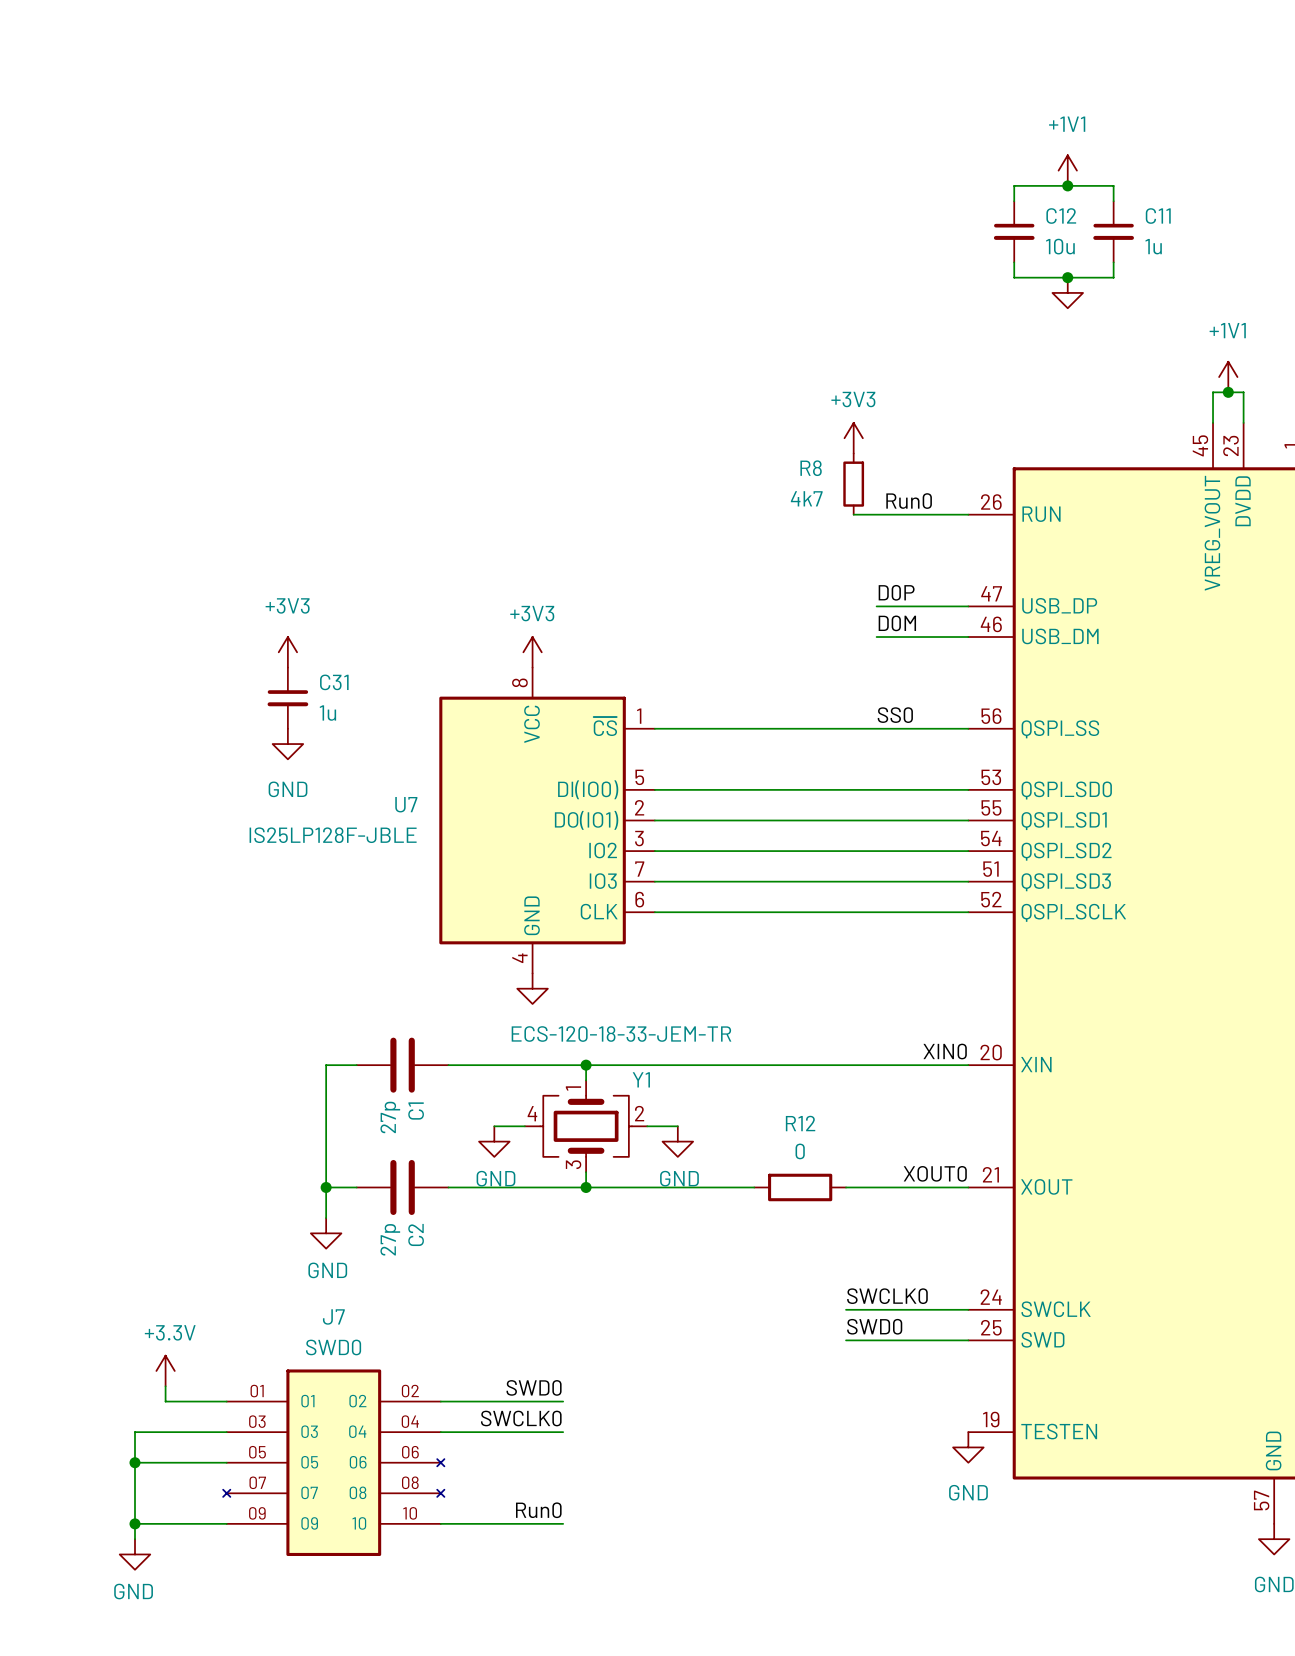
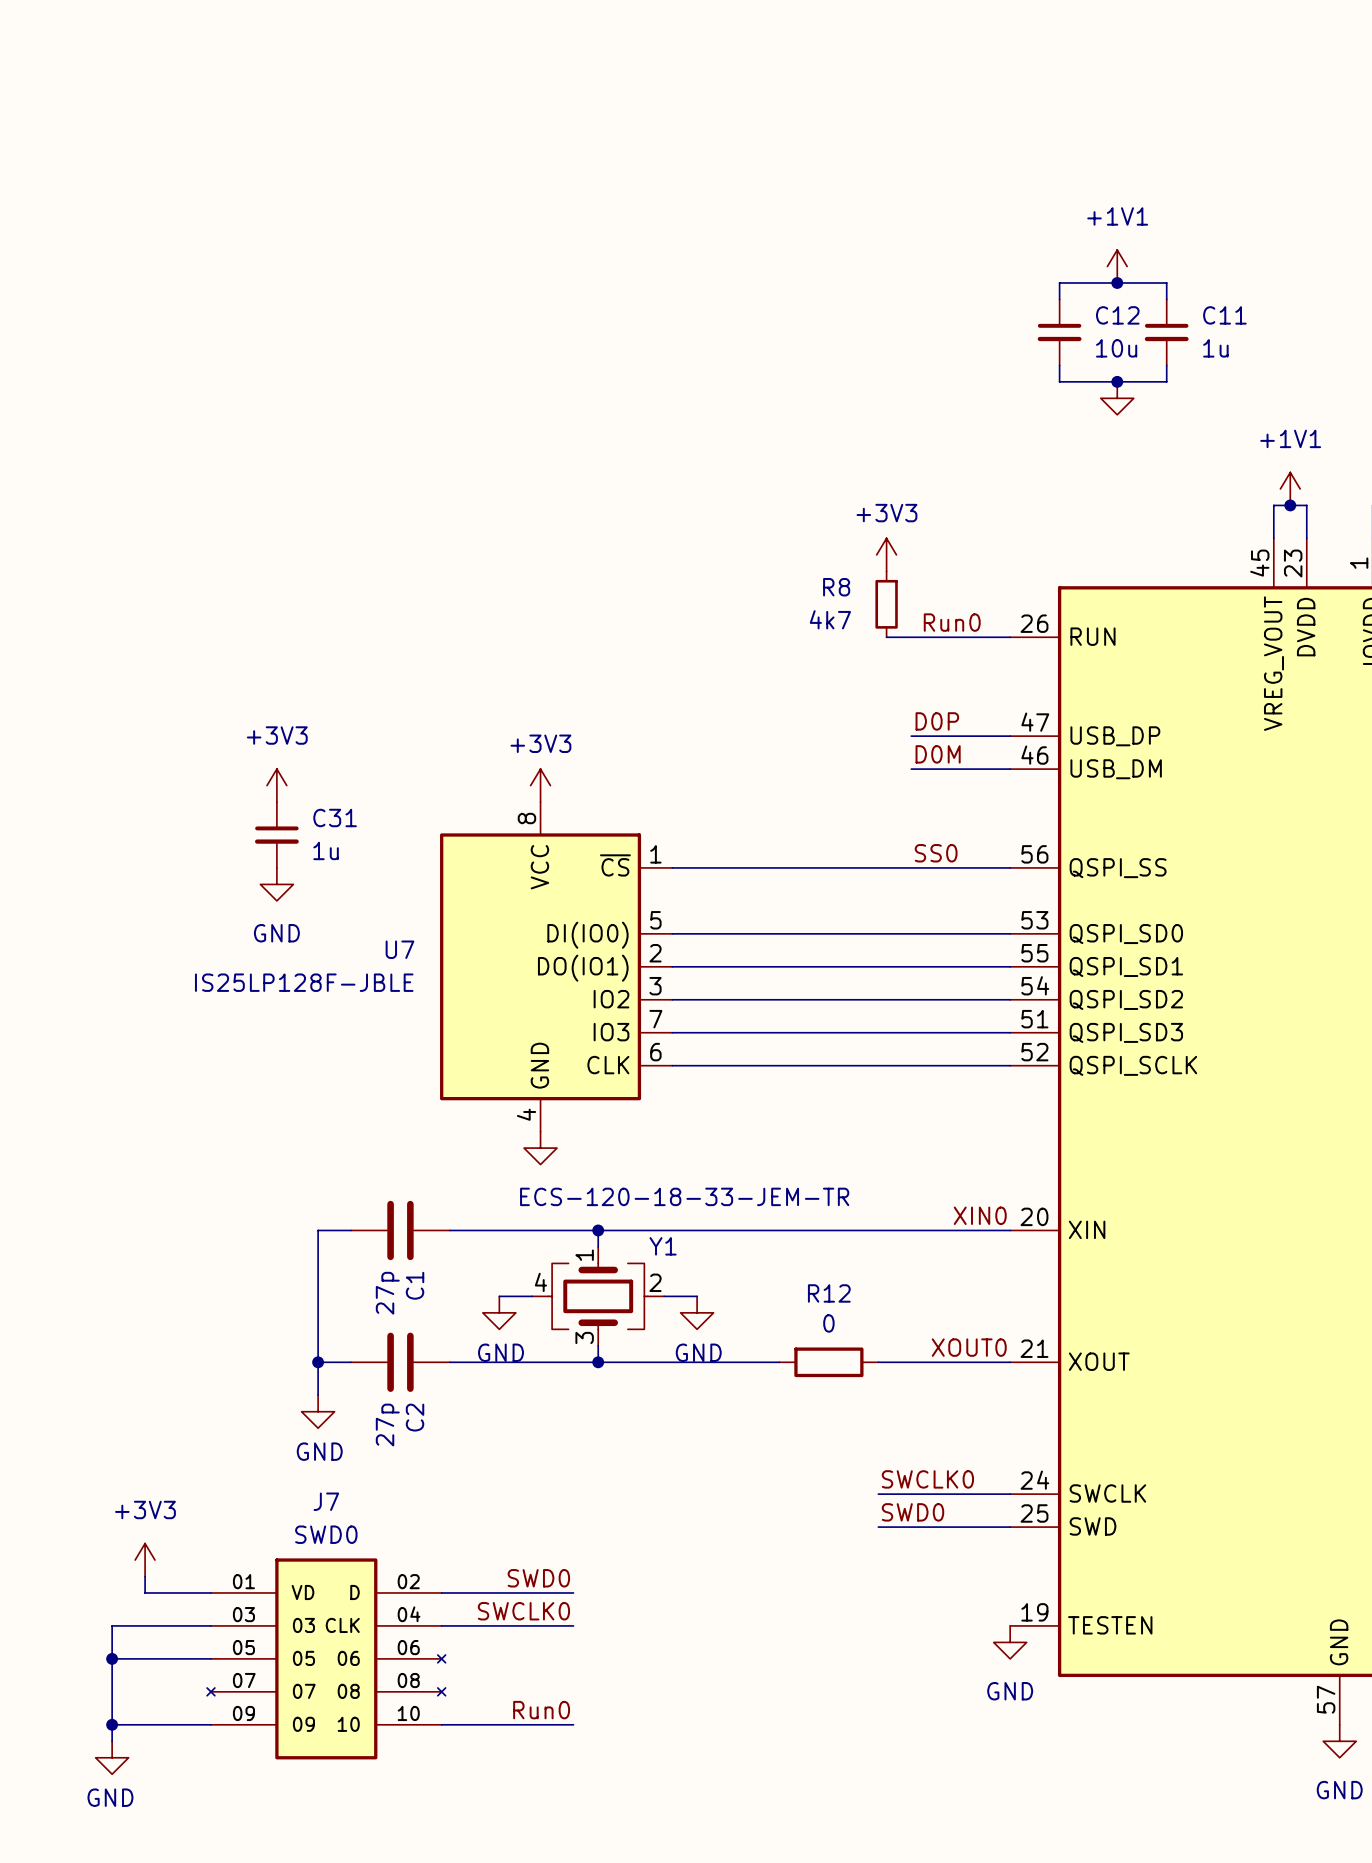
power symbol: +3.3V (165, 1370) -> +3V3 (145, 1560)
J7 pin name: 01 (307, 1401) -> VD (302, 1592)
J7 pin name: 02 (357, 1401) -> D (355, 1592)
J7 pin name: 04 (357, 1431) -> CLK (342, 1625)

